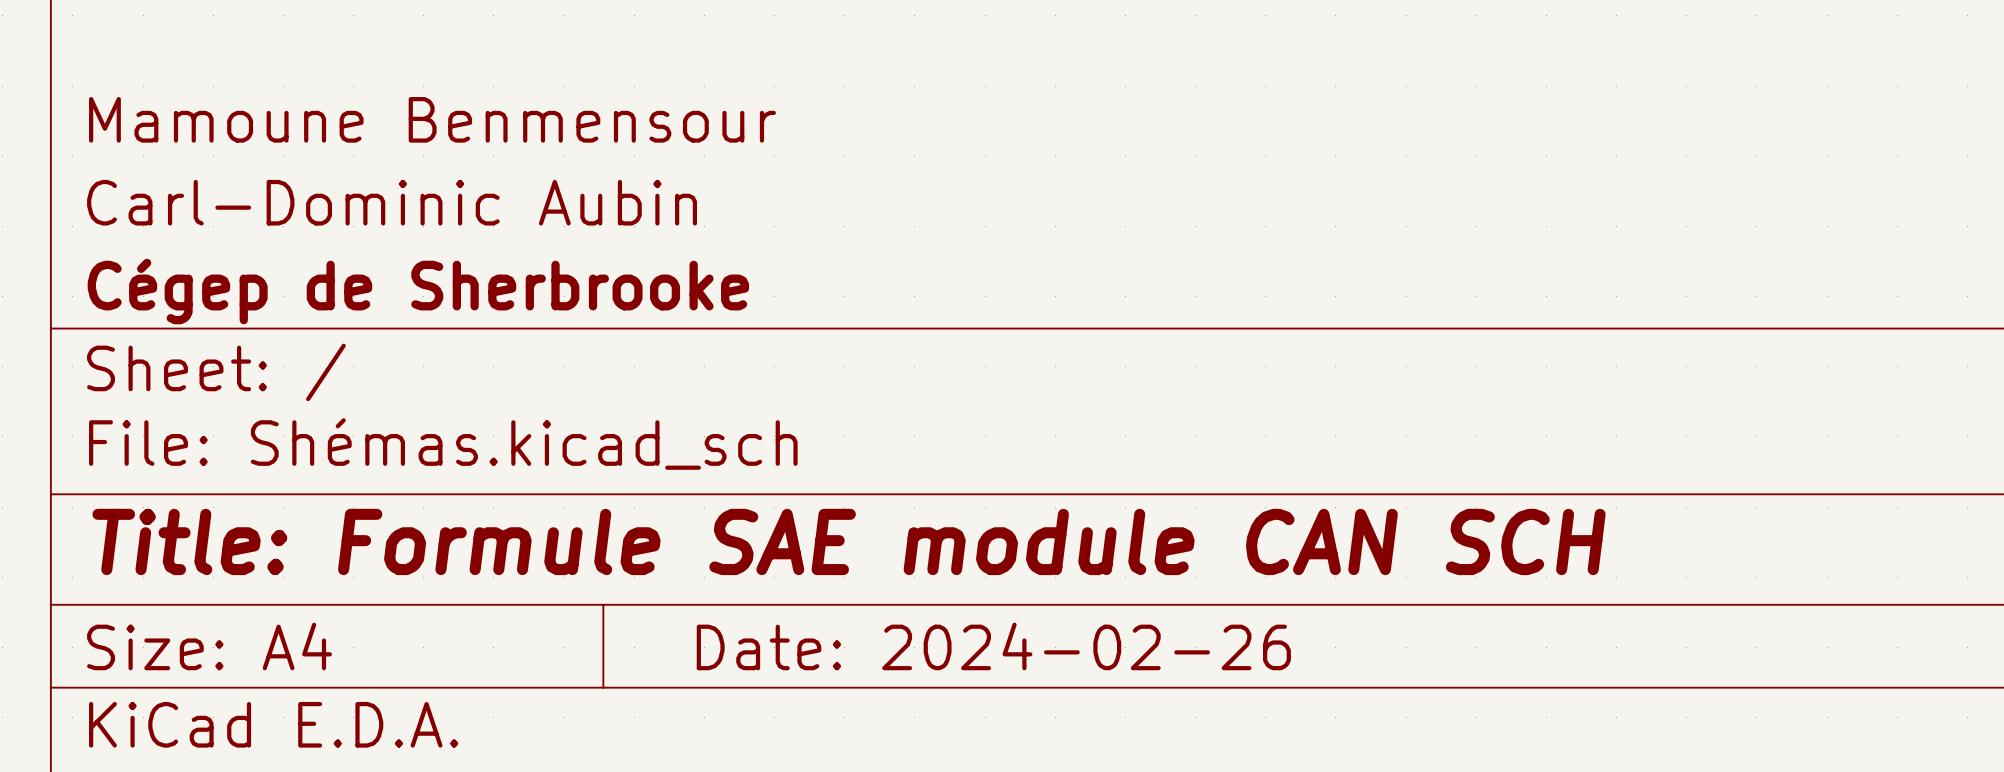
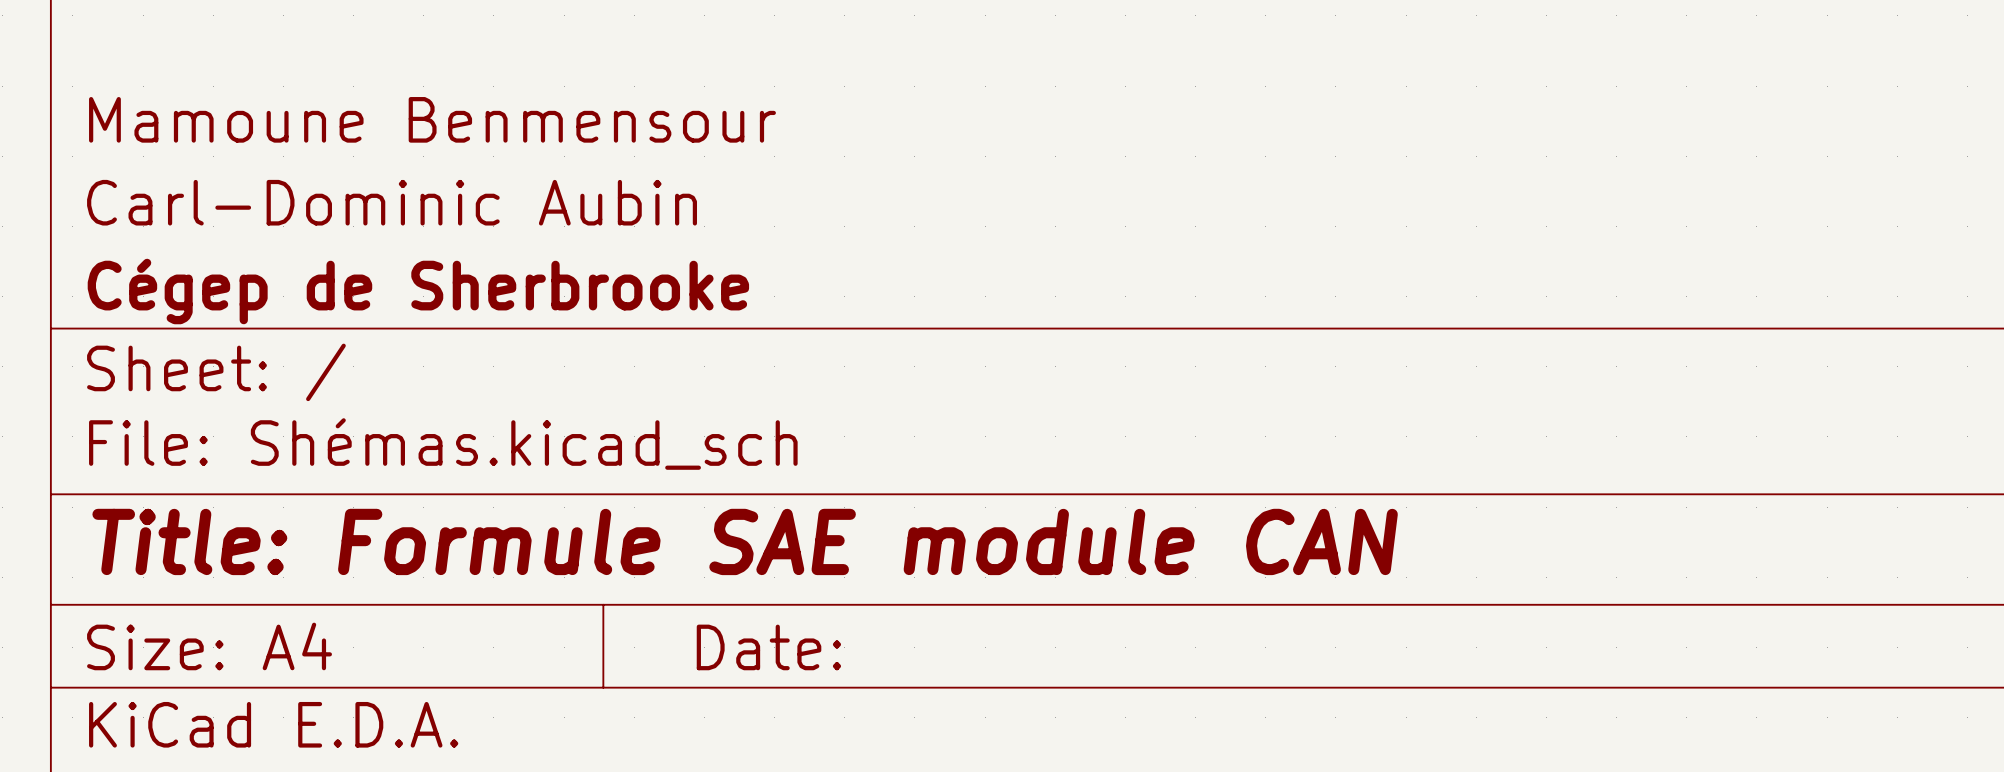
title block: Title: Formule SAE module CAN SCH (849, 541) -> Title: Formule SAE module CAN (745, 541)
title block: Date: 2024-02-26 (993, 646) -> Date: (768, 647)

